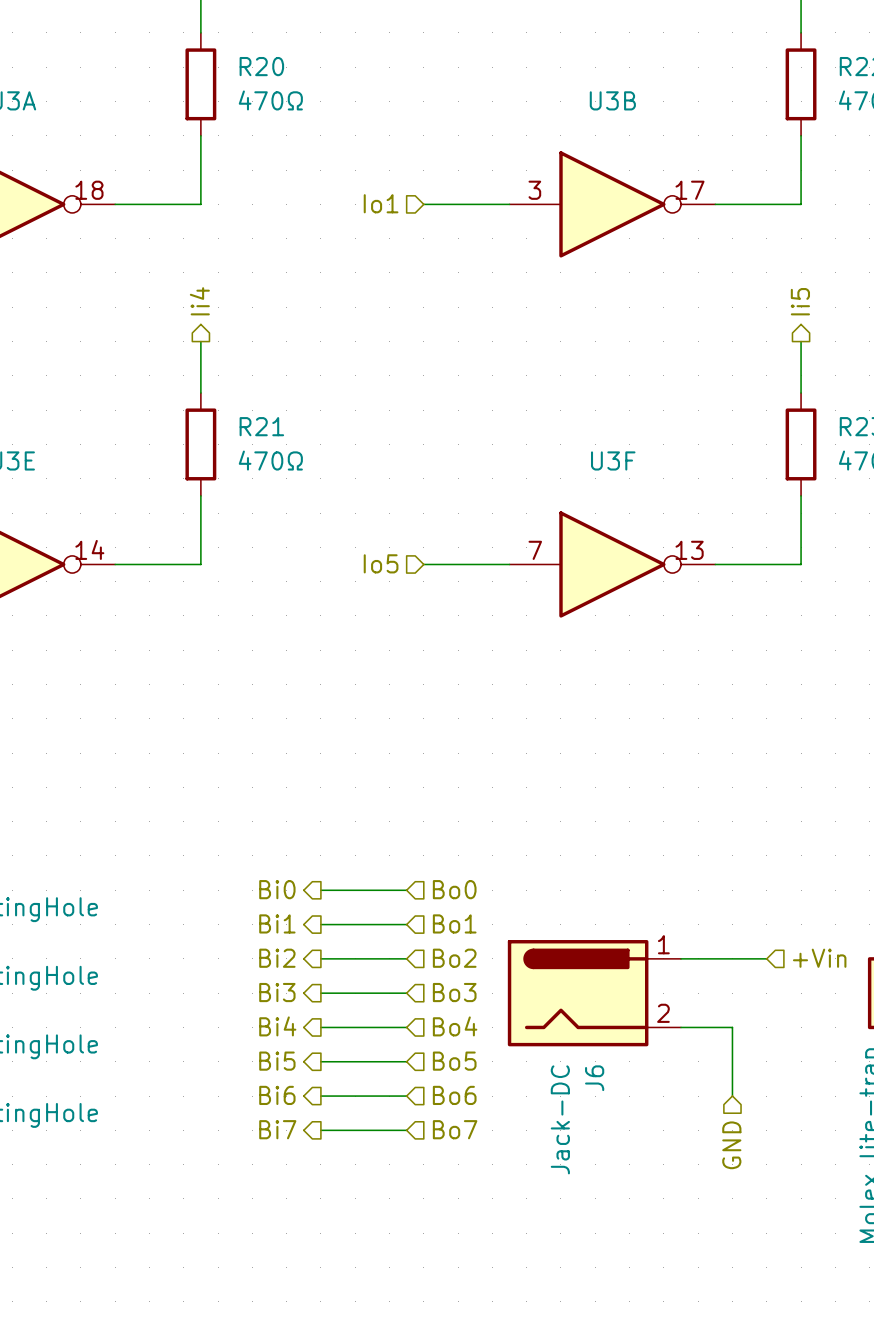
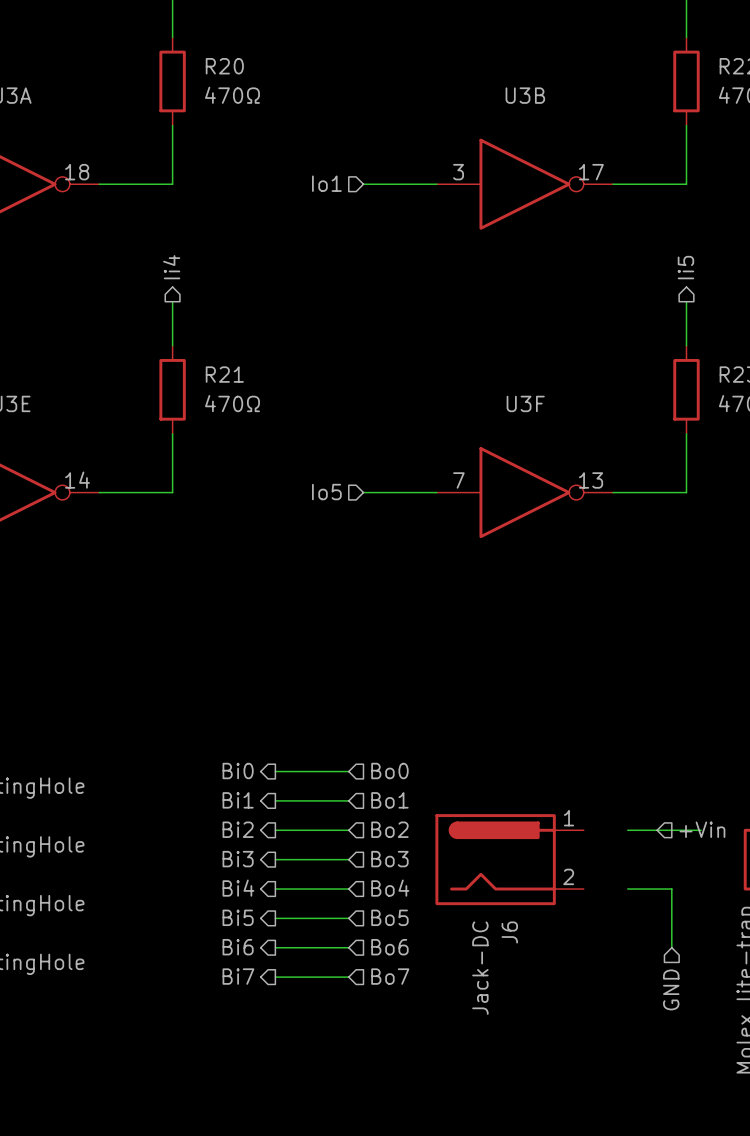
wire: (681, 958) (732, 958) -> (657, 830) (701, 830)
wire: (681, 1027) (732, 1027) (732, 1096) -> (627, 889) (671, 889) (671, 947)
hierarchical label position: GND (731, 1145) -> GND (671, 989)

